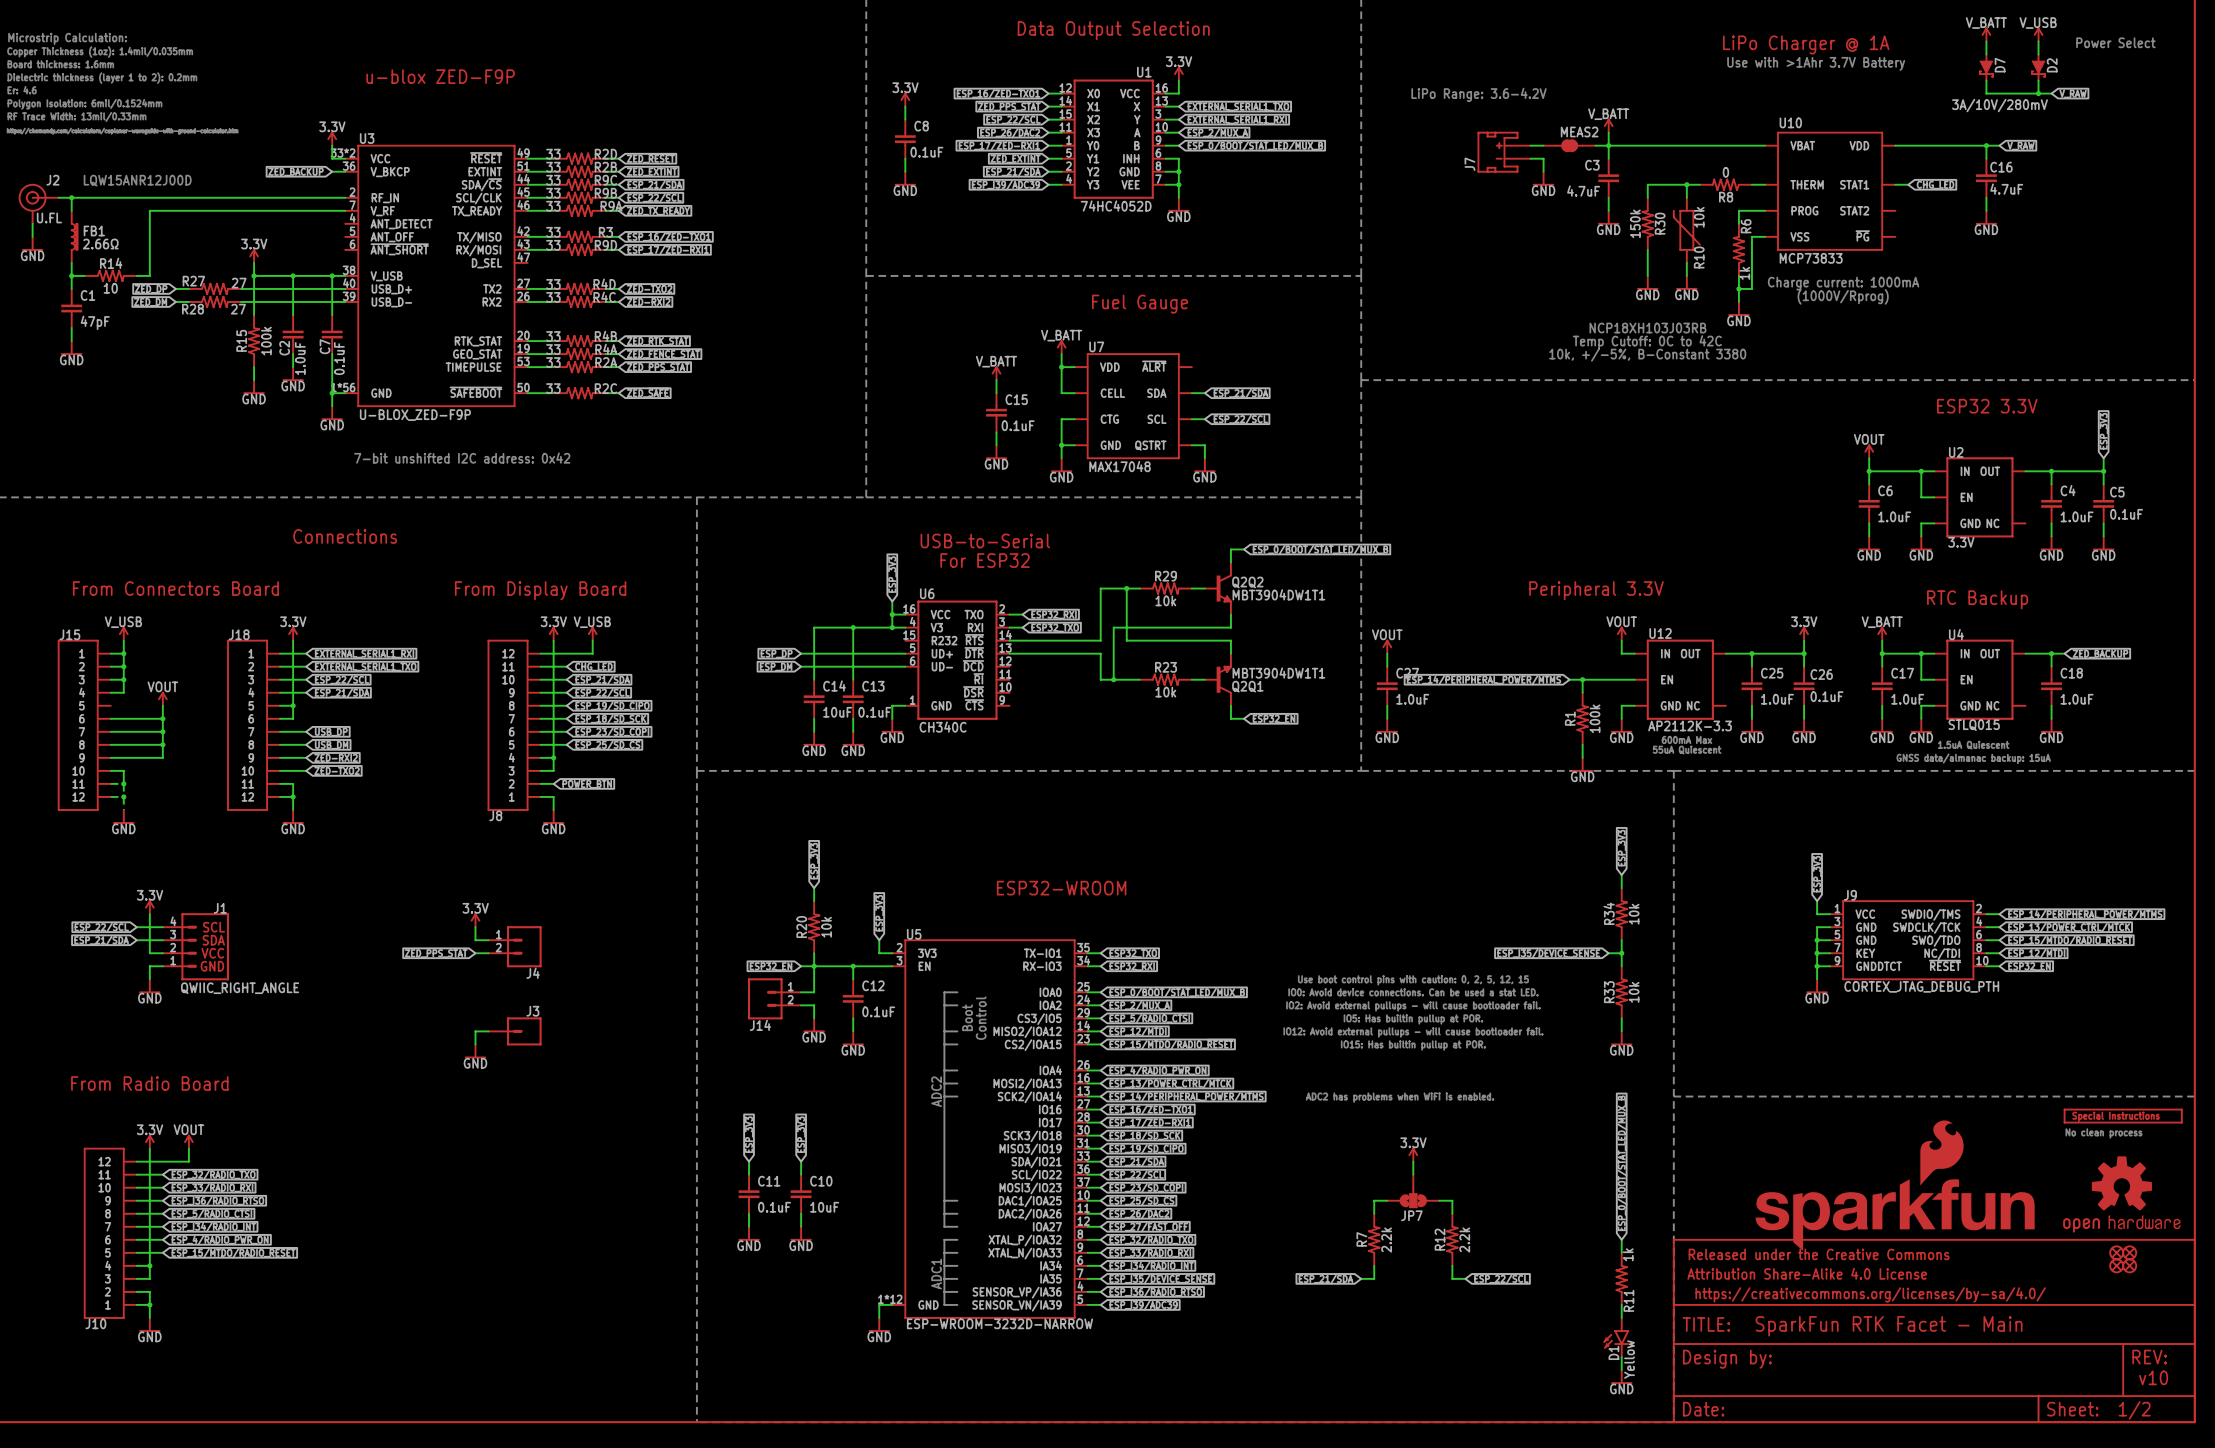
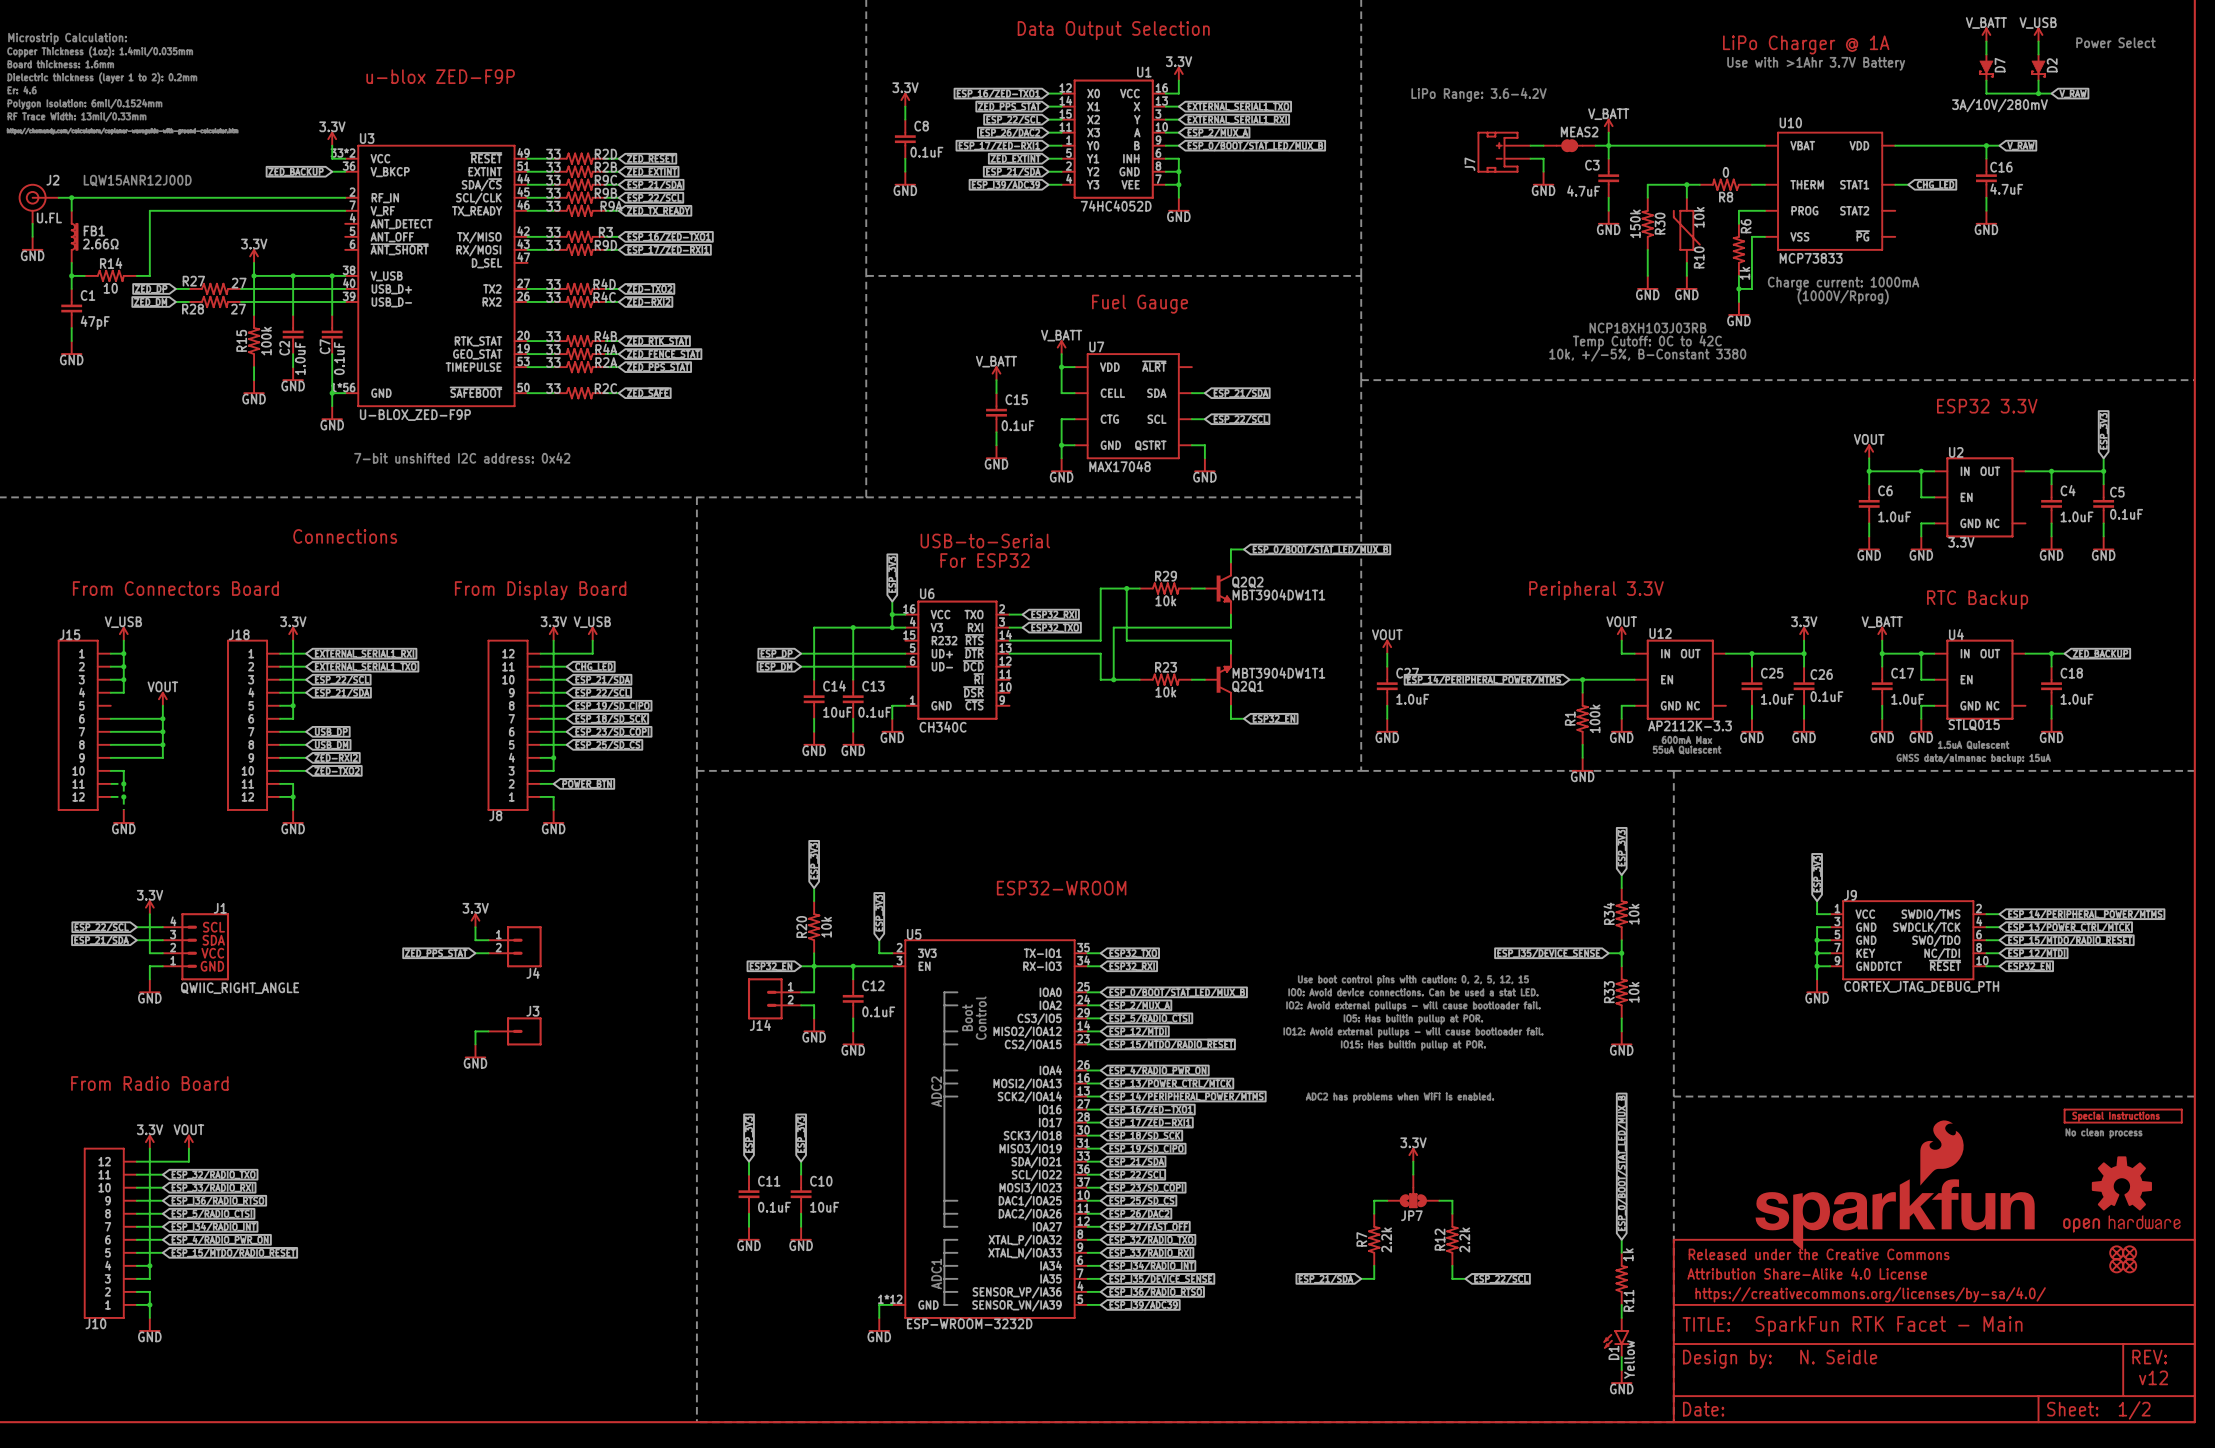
U5 value: ESP-WROOM-3232D-NARROW (999, 1323) -> ESP-WROOM-3232D (969, 1323)
text: none -> N. Seidle (1838, 1357)
text: v10 (2153, 1377) -> v12 (2153, 1377)

